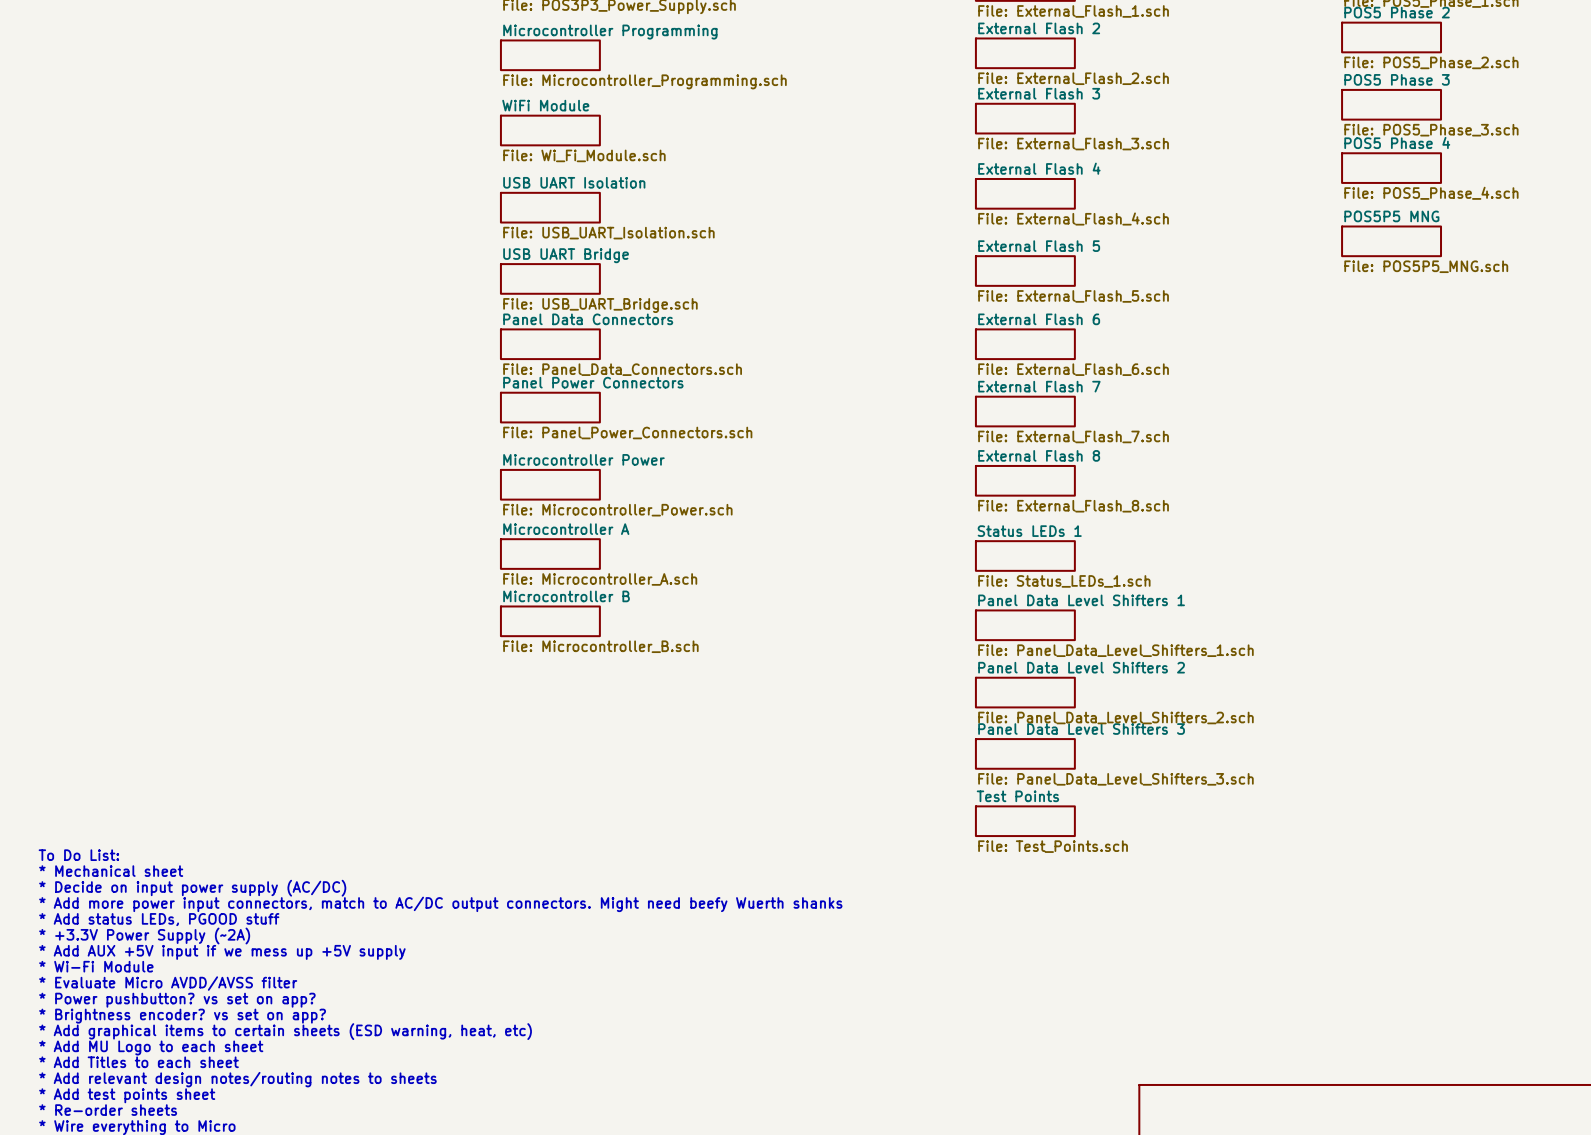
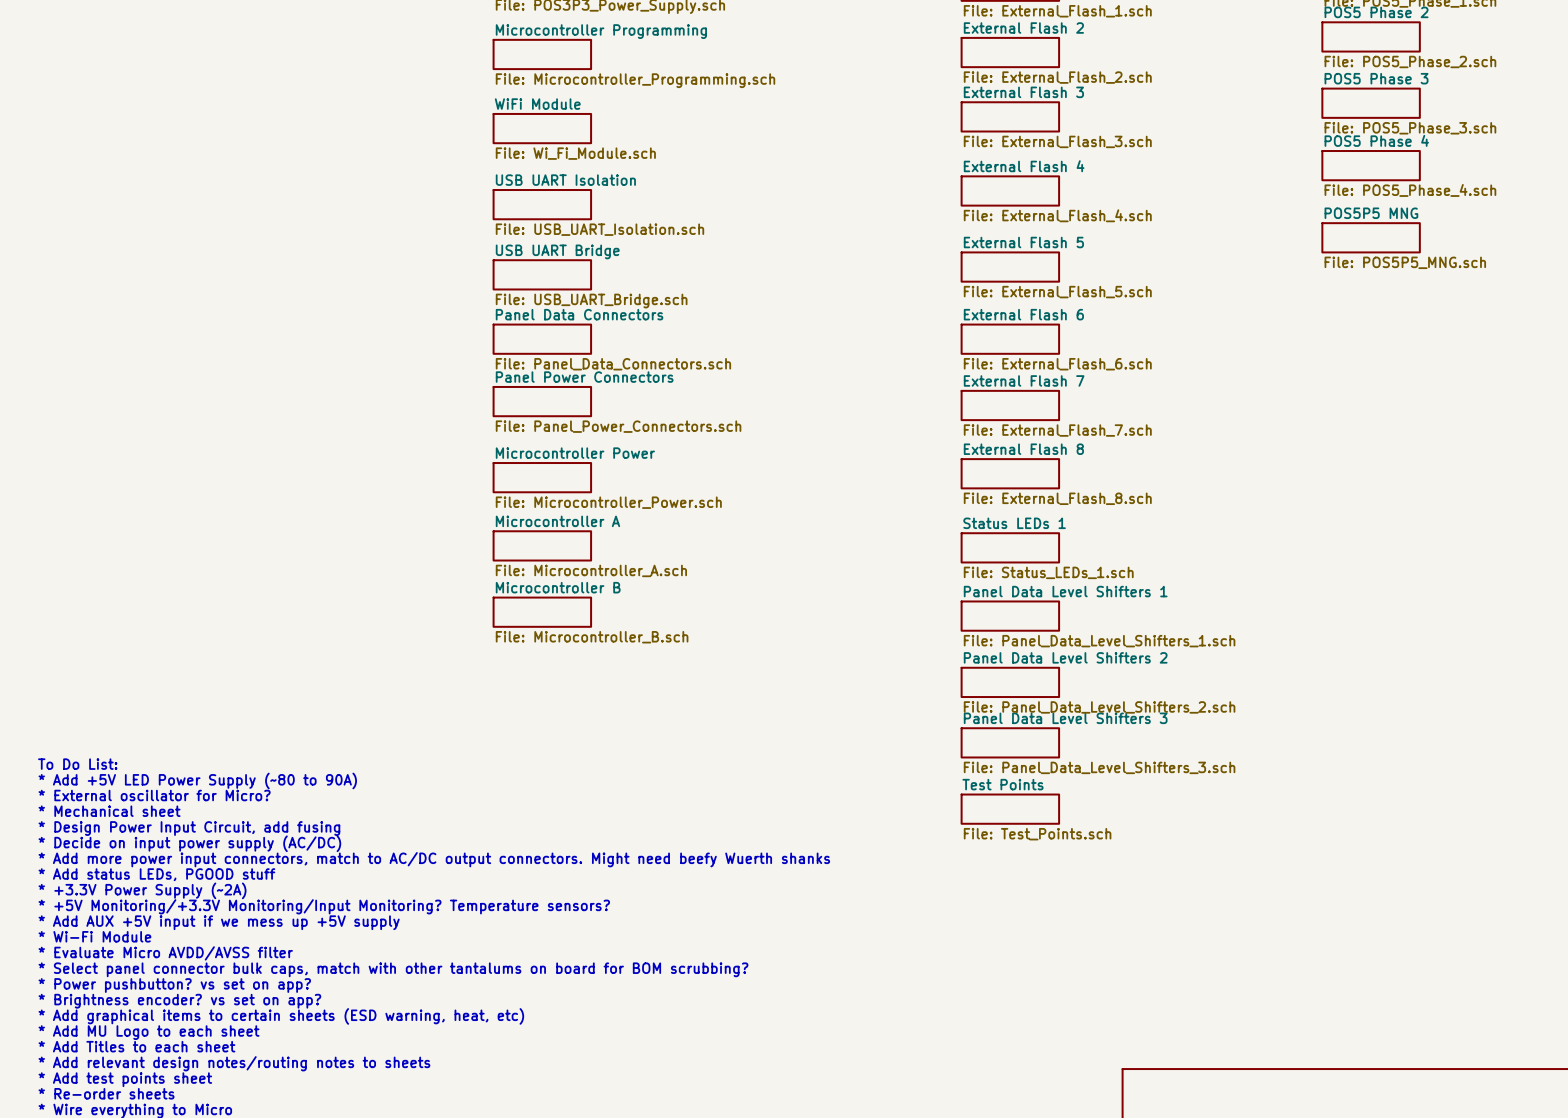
text: none -> To Do List: (77, 764)
text: none -> * Add +5V LED Power Supply (~80 to 90A) (197, 780)
text: none -> * External oscillator for Micro? (154, 795)
text: none -> * Mechanical sheet (109, 811)
text: none -> * Design Power Input Circuit, add fusing (189, 828)
text: To Do List: (78, 855) -> * Decide on input power supply (AC/DC) (189, 843)
text: * Mechanical sheet (111, 871) -> * Add more power input connectors, match to AC/DC output connectors. Might need beefy Wuerth shanks (434, 859)
text: * Decide on input power supply (AC/DC) (192, 888) -> * Add status LEDs, PGOOD stuff (156, 874)
text: * Add more power input connectors, match to AC/DC output connectors. Might need beefy Wuerth shanks (440, 904) -> * +3.3V Power Supply (~2A) (142, 890)
text: * Add status LEDs, PGOOD stuff (159, 919) -> * +5V Monitoring/+3.3V Monitoring/Input Monitoring? Temperature sensors? (324, 906)
text: * +3.3V Power Supply (~2A) (144, 936) -> * Add AUX +5V input if we mess up +5V supply (219, 922)
text: * Add AUX +5V input if we mess up +5V supply (222, 952) -> * Wi-Fi Module (94, 936)
text: * Wi-Fi Module (96, 966) -> * Evaluate Micro AVDD/AVSS filter (165, 953)
text: * Evaluate Micro AVDD/AVSS filter (168, 983) -> * Select panel connector bulk caps, match with other tantalums on board for BOM scrubbing? (393, 969)

